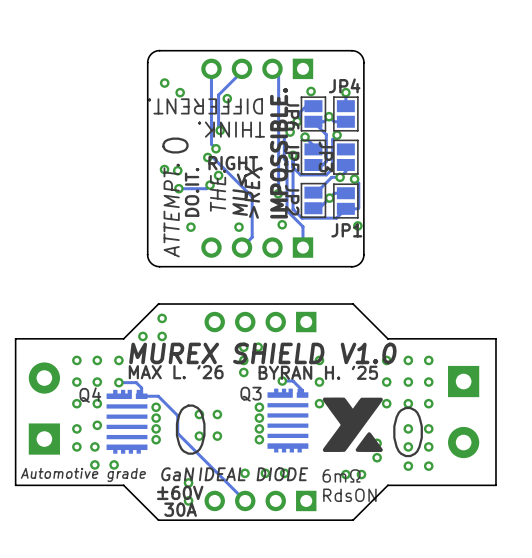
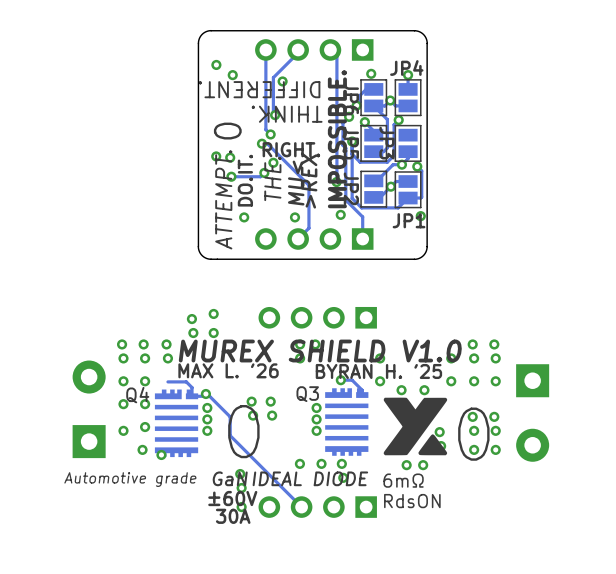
board edge: (353, 304) (387, 338) (495, 338) (495, 485) (387, 485) (353, 520) (158, 520) (123, 485) (15, 485) (15, 338) (123, 338) (158, 304) (353, 304) -> none
via: none -> (191, 319)
via: none -> (122, 344)
via: none -> (143, 344)
via: none -> (166, 344)
via: none -> (472, 344)
via: none -> (494, 344)
via: (243, 372) -> none
via: (118, 382) -> none
via: none -> (401, 390)
via: none -> (424, 390)
via: none -> (205, 394)
via: none -> (251, 401)
via: none -> (270, 401)
via: (319, 403) -> none
via: (386, 403) -> none
via: (408, 403) -> none
via: (428, 403) -> none
via: none -> (472, 416)
via: none -> (494, 416)
via: none -> (439, 432)
via: (199, 436) -> none
via: (217, 436) -> none
via: (156, 439) -> none
via: (259, 439) -> none
via: (76, 446) -> none
via: none -> (161, 454)
via: (377, 457) -> none
via: none -> (299, 463)
via: none -> (321, 463)
via: none -> (341, 463)
via: none -> (406, 465)
via: none -> (423, 465)
via: (94, 464) -> none
via: (114, 464) -> none
via: (408, 466) -> none
via: (428, 466) -> none
via: none -> (240, 474)
via: (245, 473) -> none
via: (265, 473) -> none
via: (345, 474) -> none
via: (361, 474) -> none

